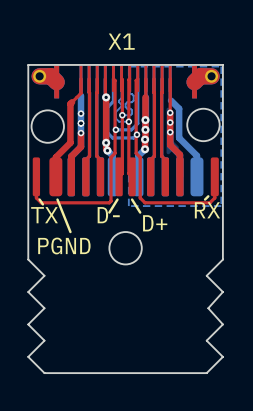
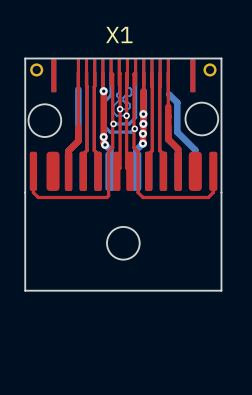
bottom zone outline: (128, 66) (128, 206) (221, 206) (221, 66) (128, 66) -> none
top track: (39, 76) (50, 76) (56, 82) -> none
top track: (211, 76) (200, 76) (194, 82) -> none
top track: (81, 93) (70, 103) (70, 142) (55, 157) (55, 176) -> (78, 87) (78, 127)
via: (170, 112) -> none
via: (81, 113) -> none
via: (170, 122) -> none
via: (81, 123) -> none
via: (170, 132) -> none
via: (81, 133) -> none
part side: bottom (196, 176) -> top (195, 171)
line: (208, 196) (205, 199) -> none
line: (39, 199) (42, 204) -> none
line: (57, 199) (70, 232) -> none
line: (117, 199) (109, 212) -> none
line: (132, 199) (140, 212) -> none
text: RX (207, 210) -> none
text: TX (44, 215) -> none
text: D- (108, 215) -> none
text: D+ (155, 223) -> none
text: PGND (64, 246) -> none
board edge: (28, 259) (44, 275) (28, 292) (44, 308) (28, 324) (44, 340) (28, 356) (44, 373) (206, 373) (222, 356) (206, 340) (222, 324) (208, 308) (222, 292) (206, 275) (222, 259) -> (25, 254) (25, 290) (221, 290) (221, 254)

